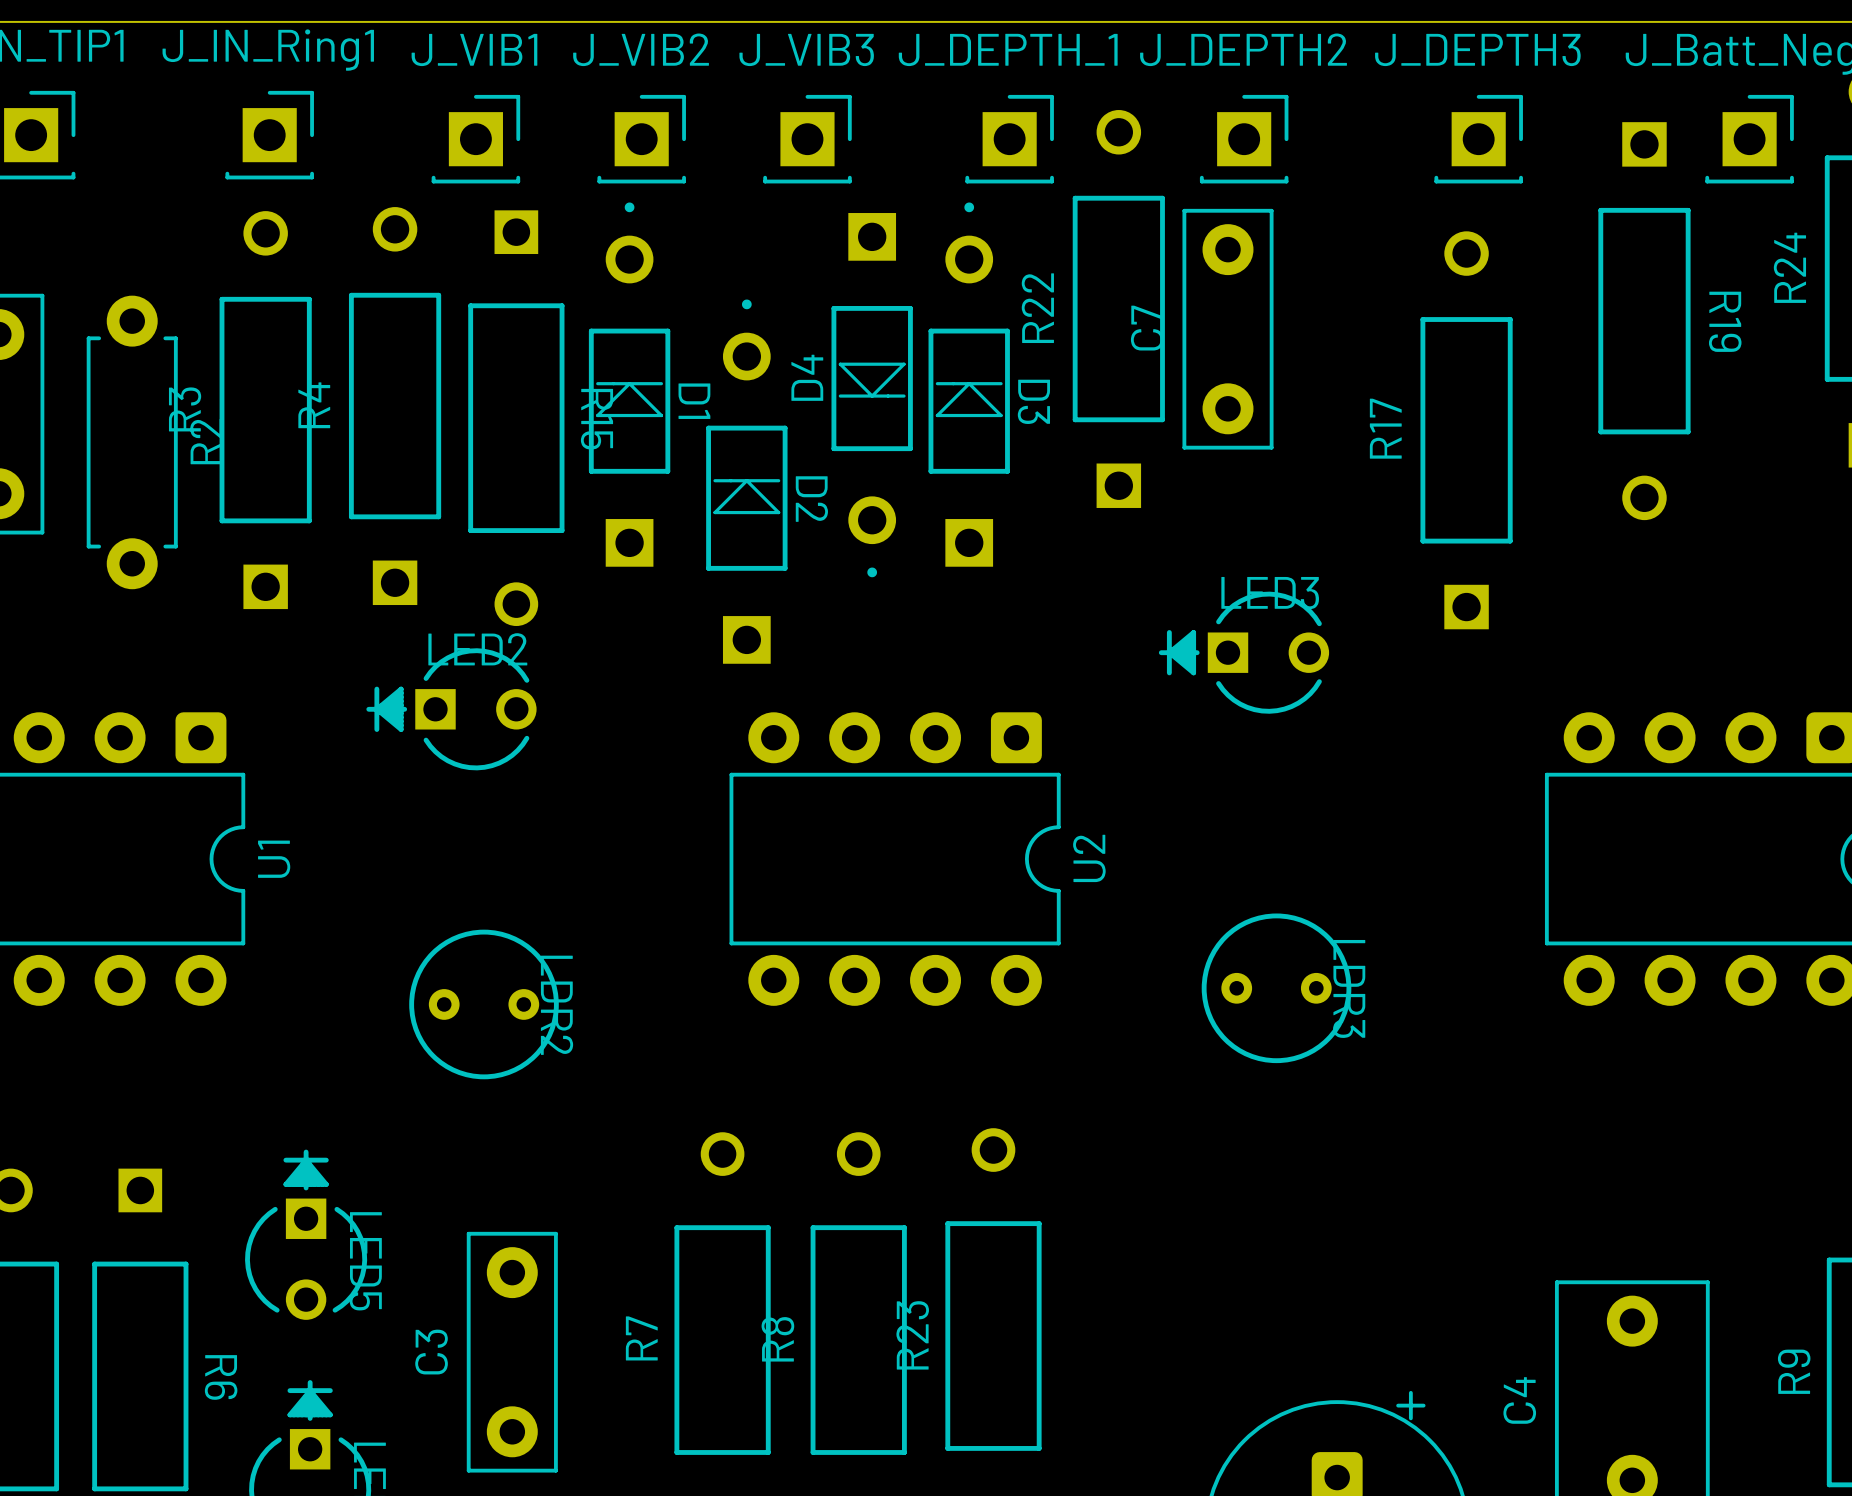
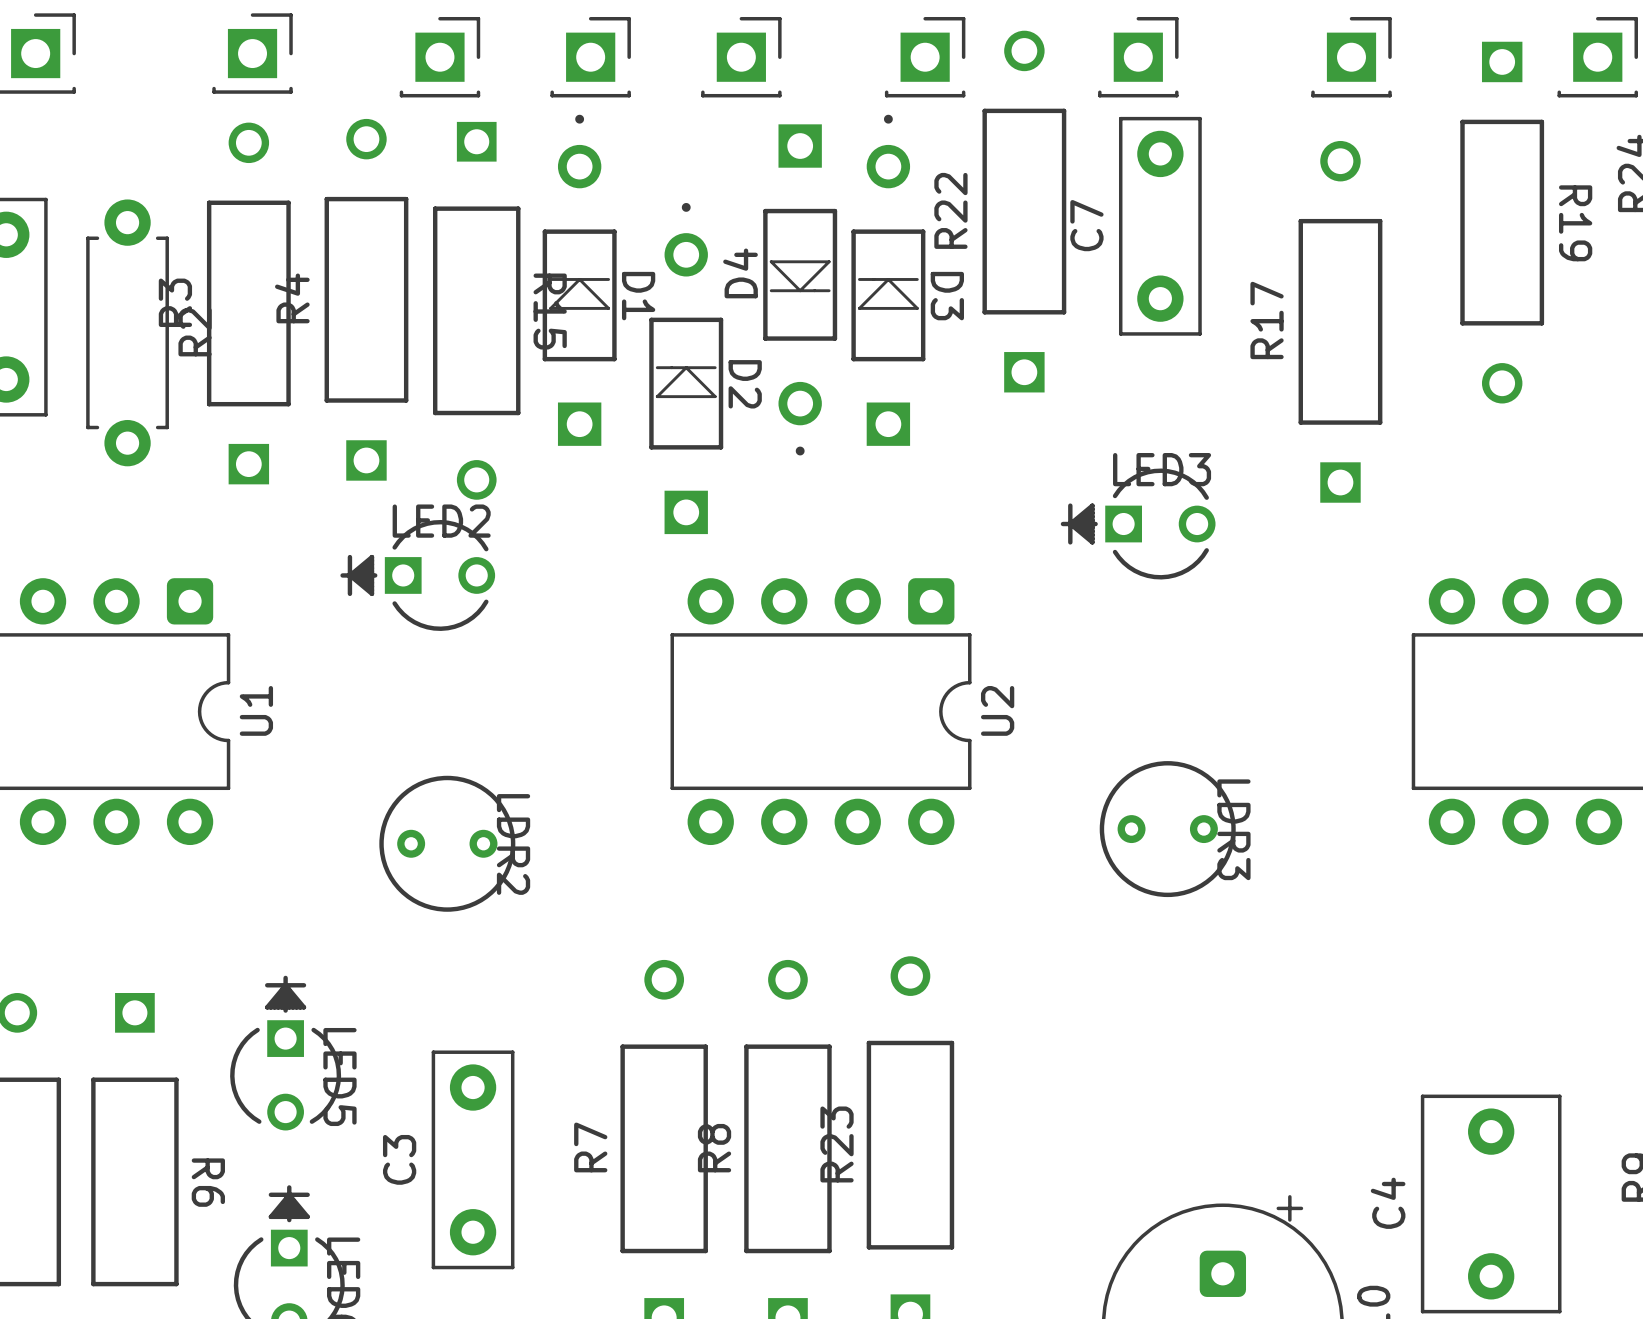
C7 position: (1228, 329) -> (1160, 226)

